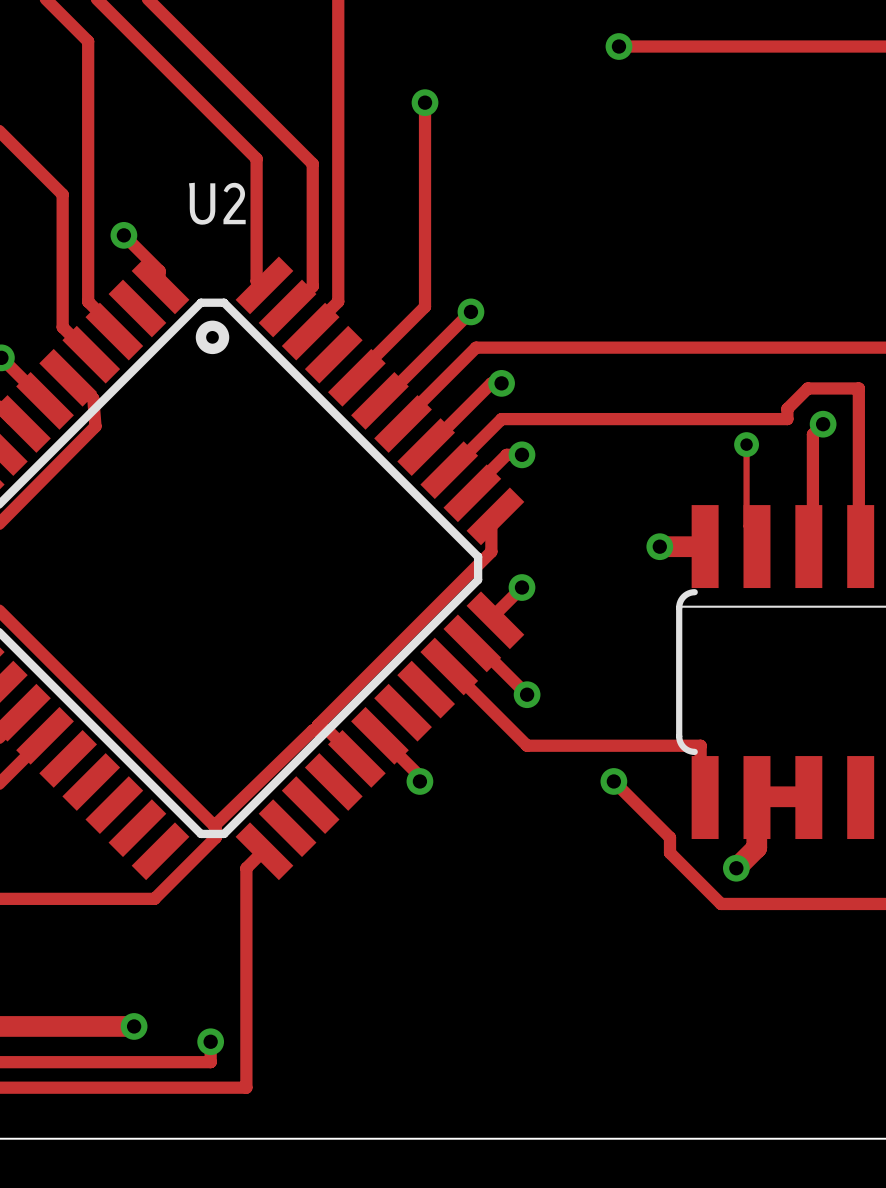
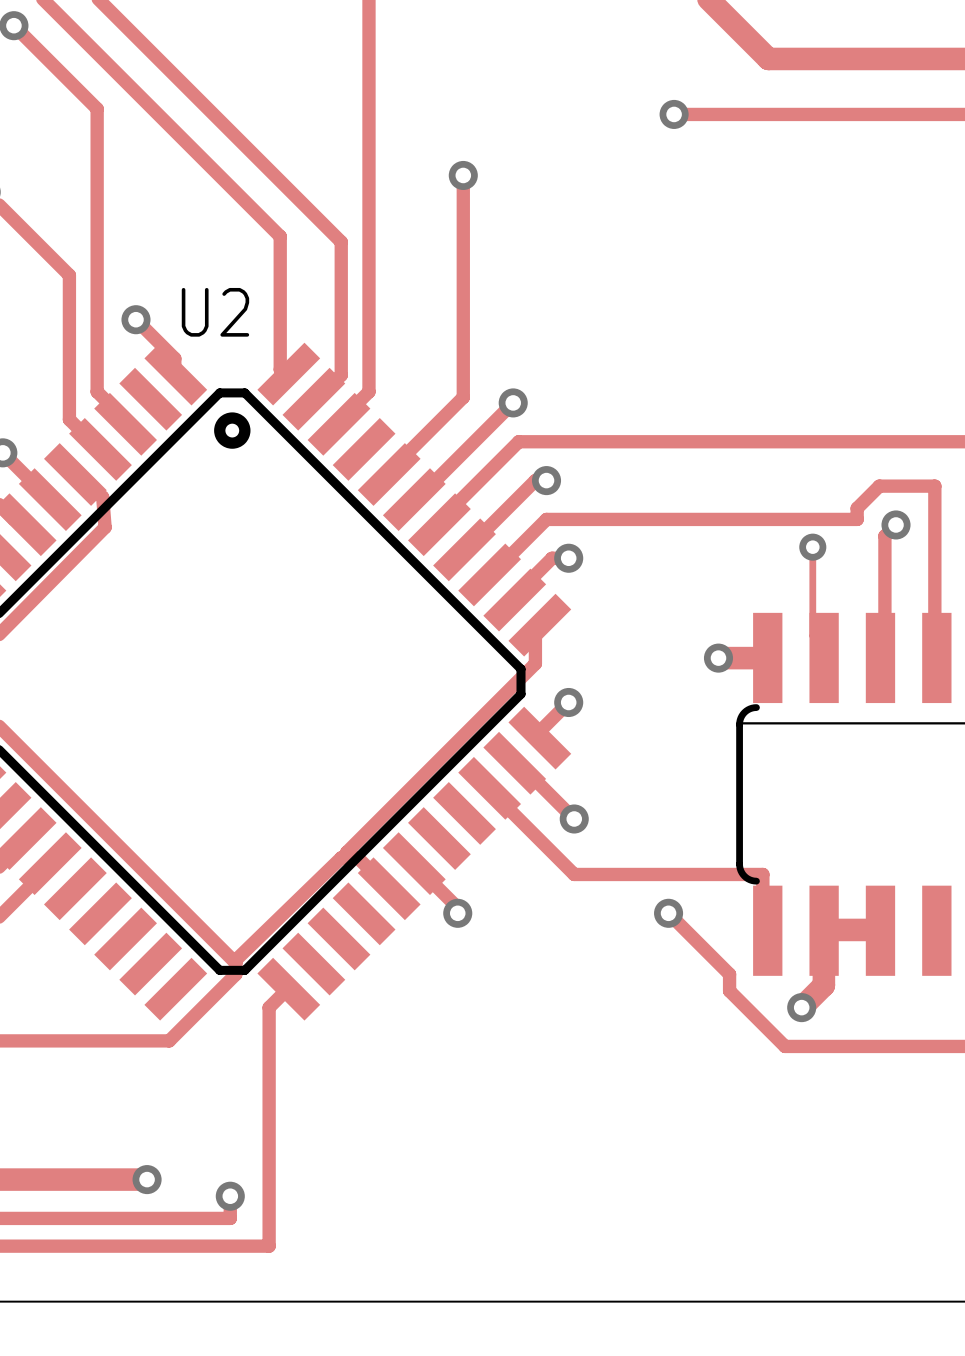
U2 name position: U2 (217, 203) -> U2 (215, 312)

